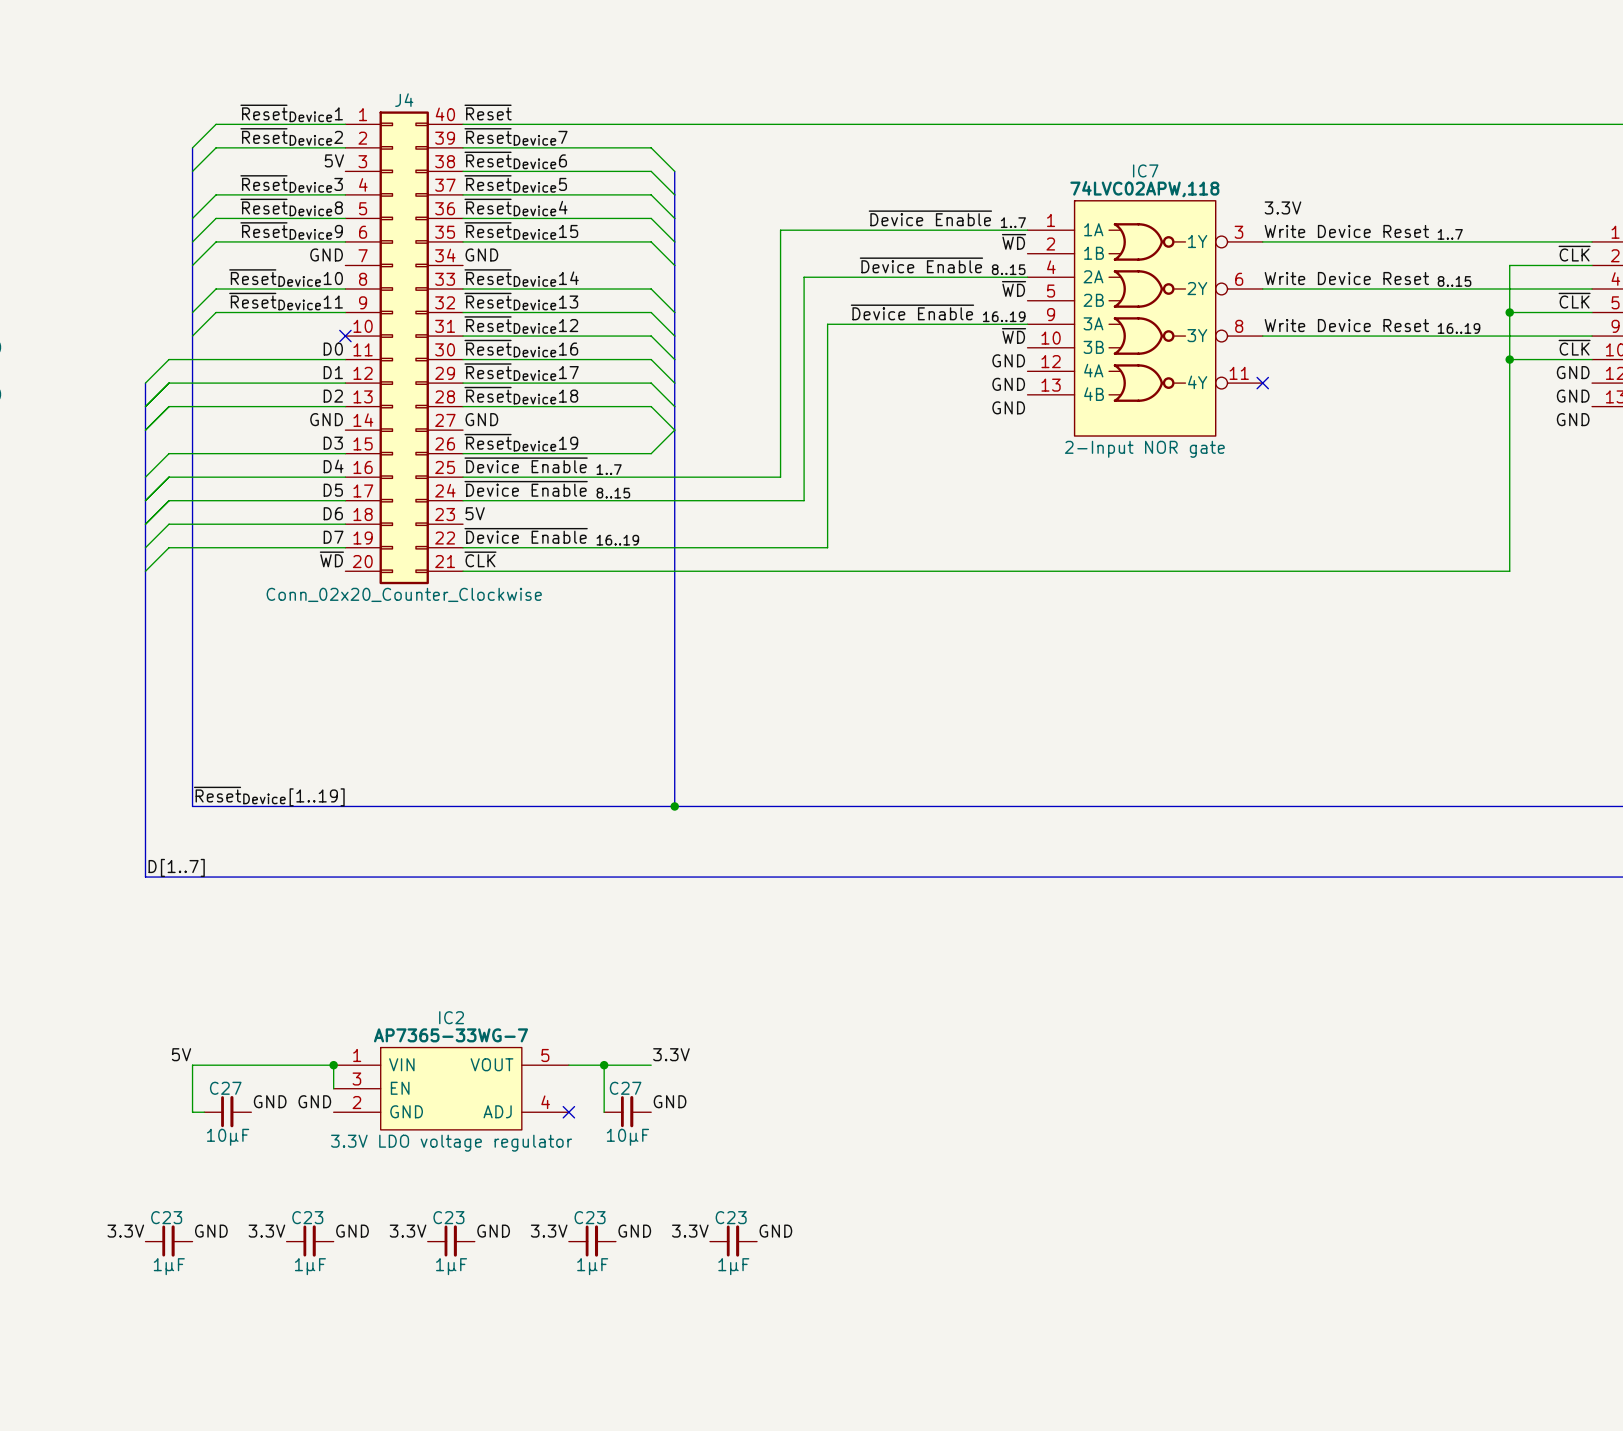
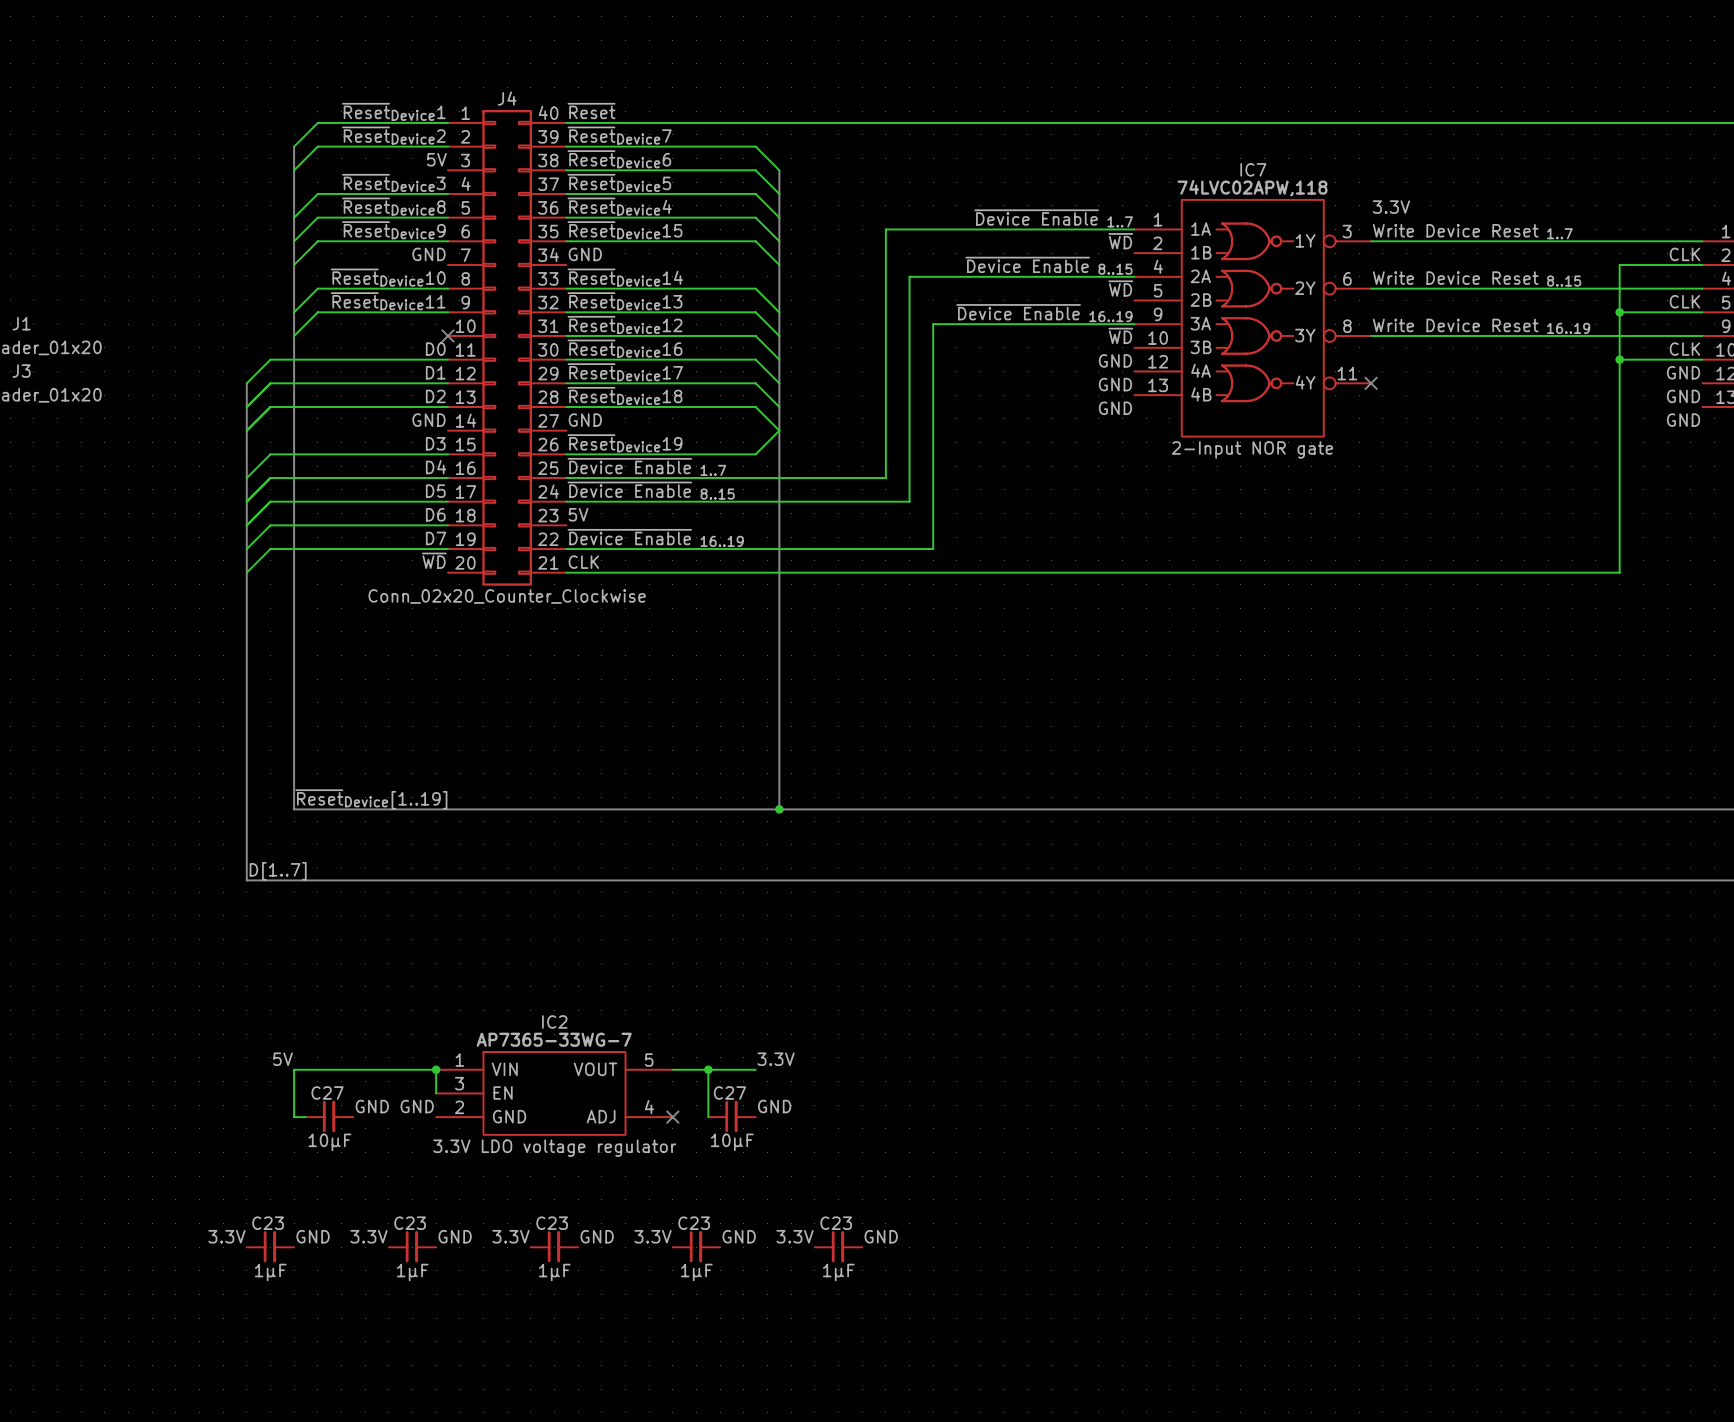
label: ~{CLK} (1574, 253) -> CLK (1684, 254)
label: ~{CLK} (1574, 300) -> CLK (1684, 301)
label: ~{CLK} (1574, 347) -> CLK (1684, 349)
label: ~{CLK} (480, 559) -> CLK (583, 562)

